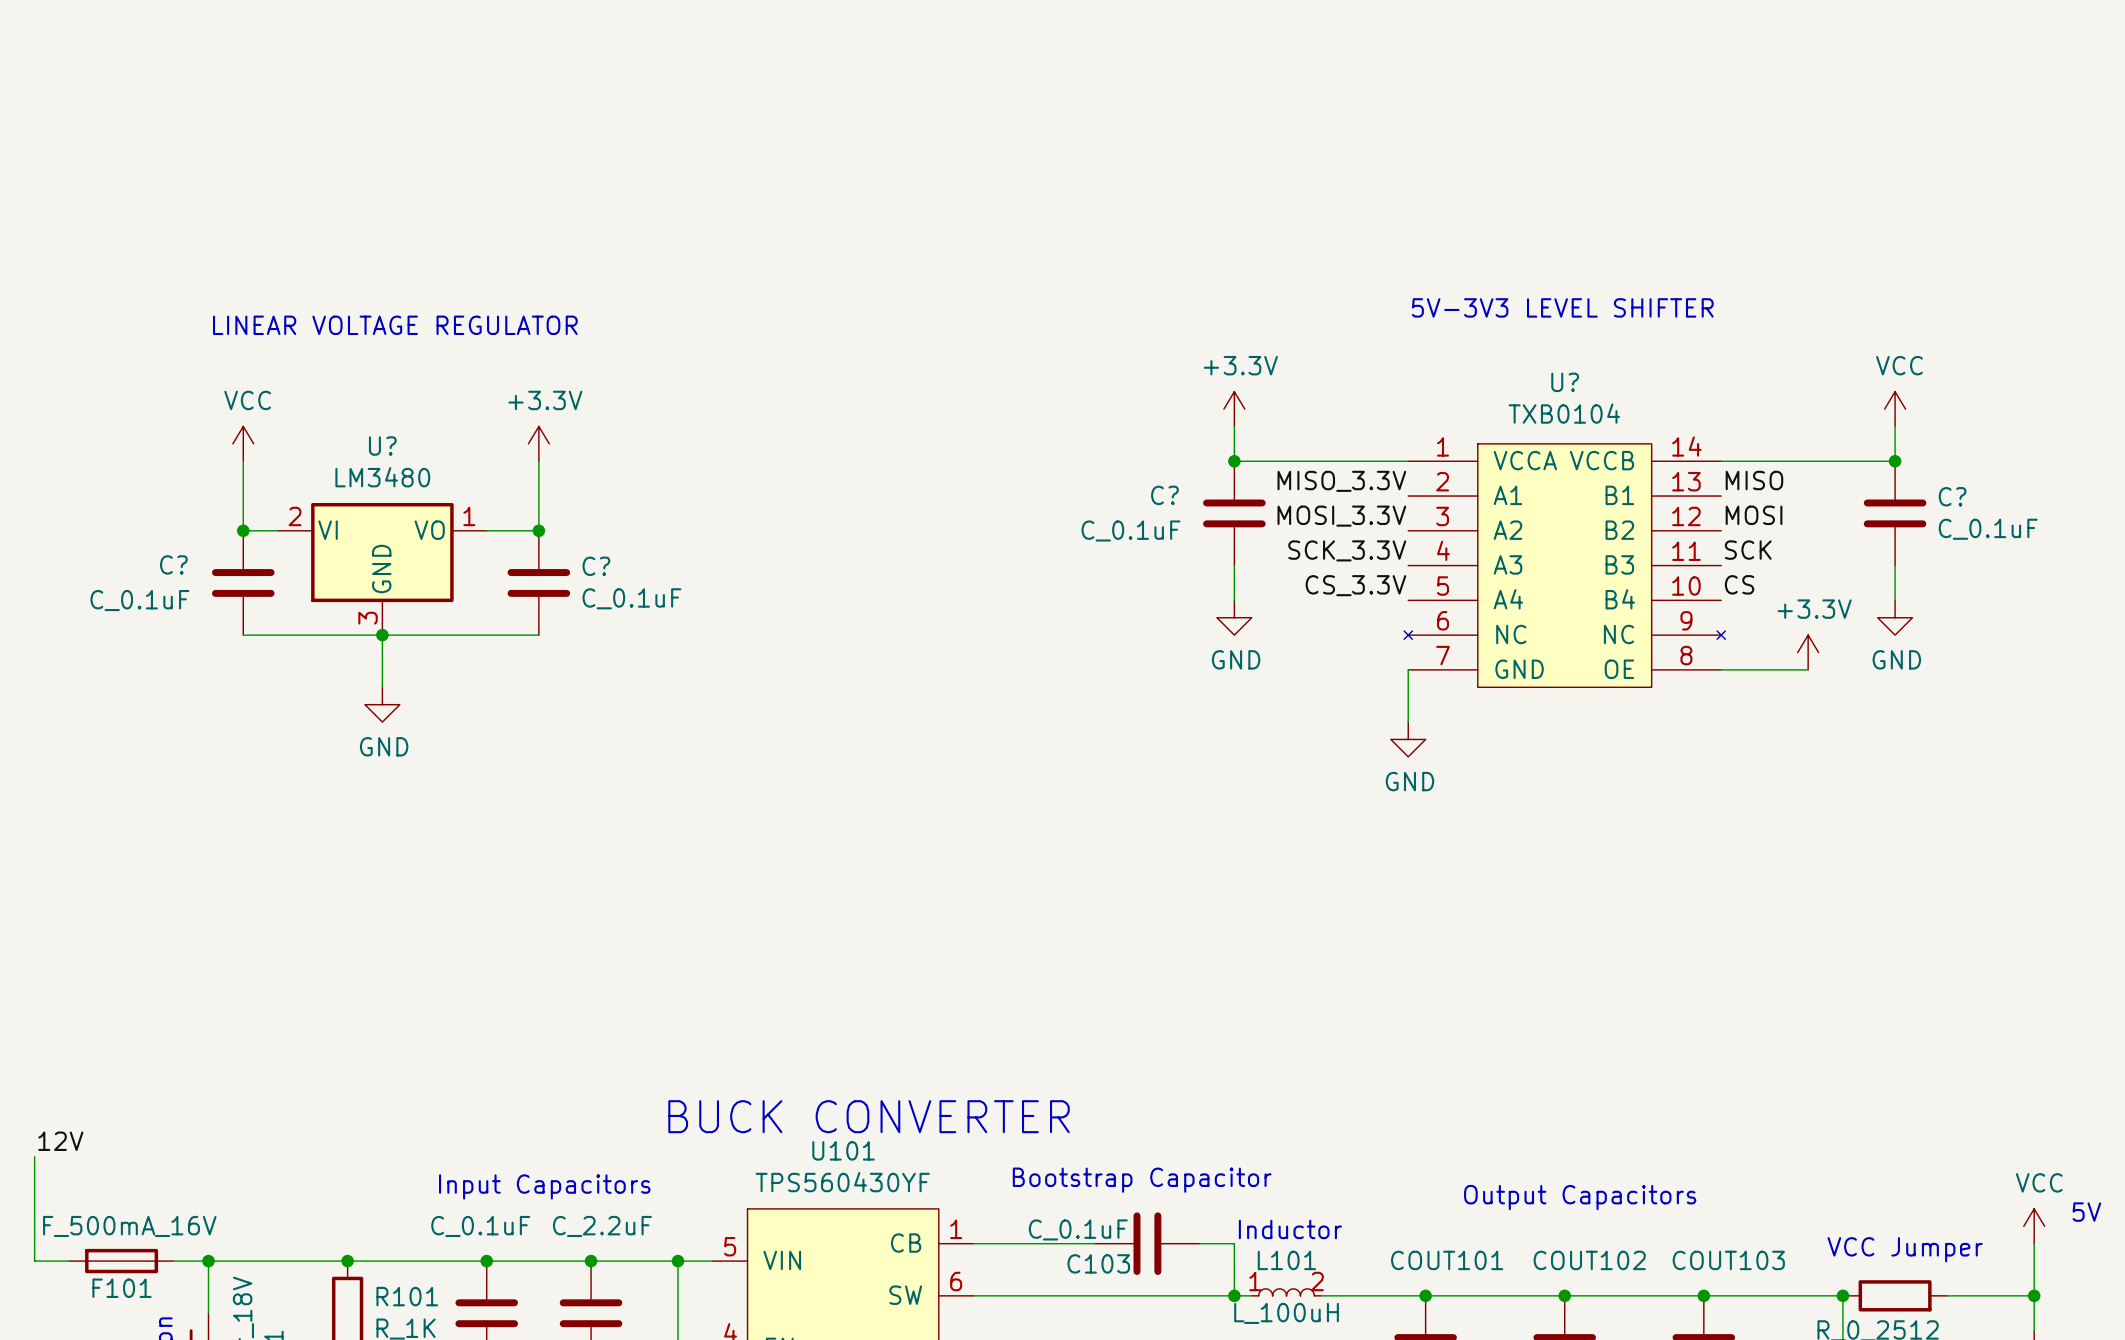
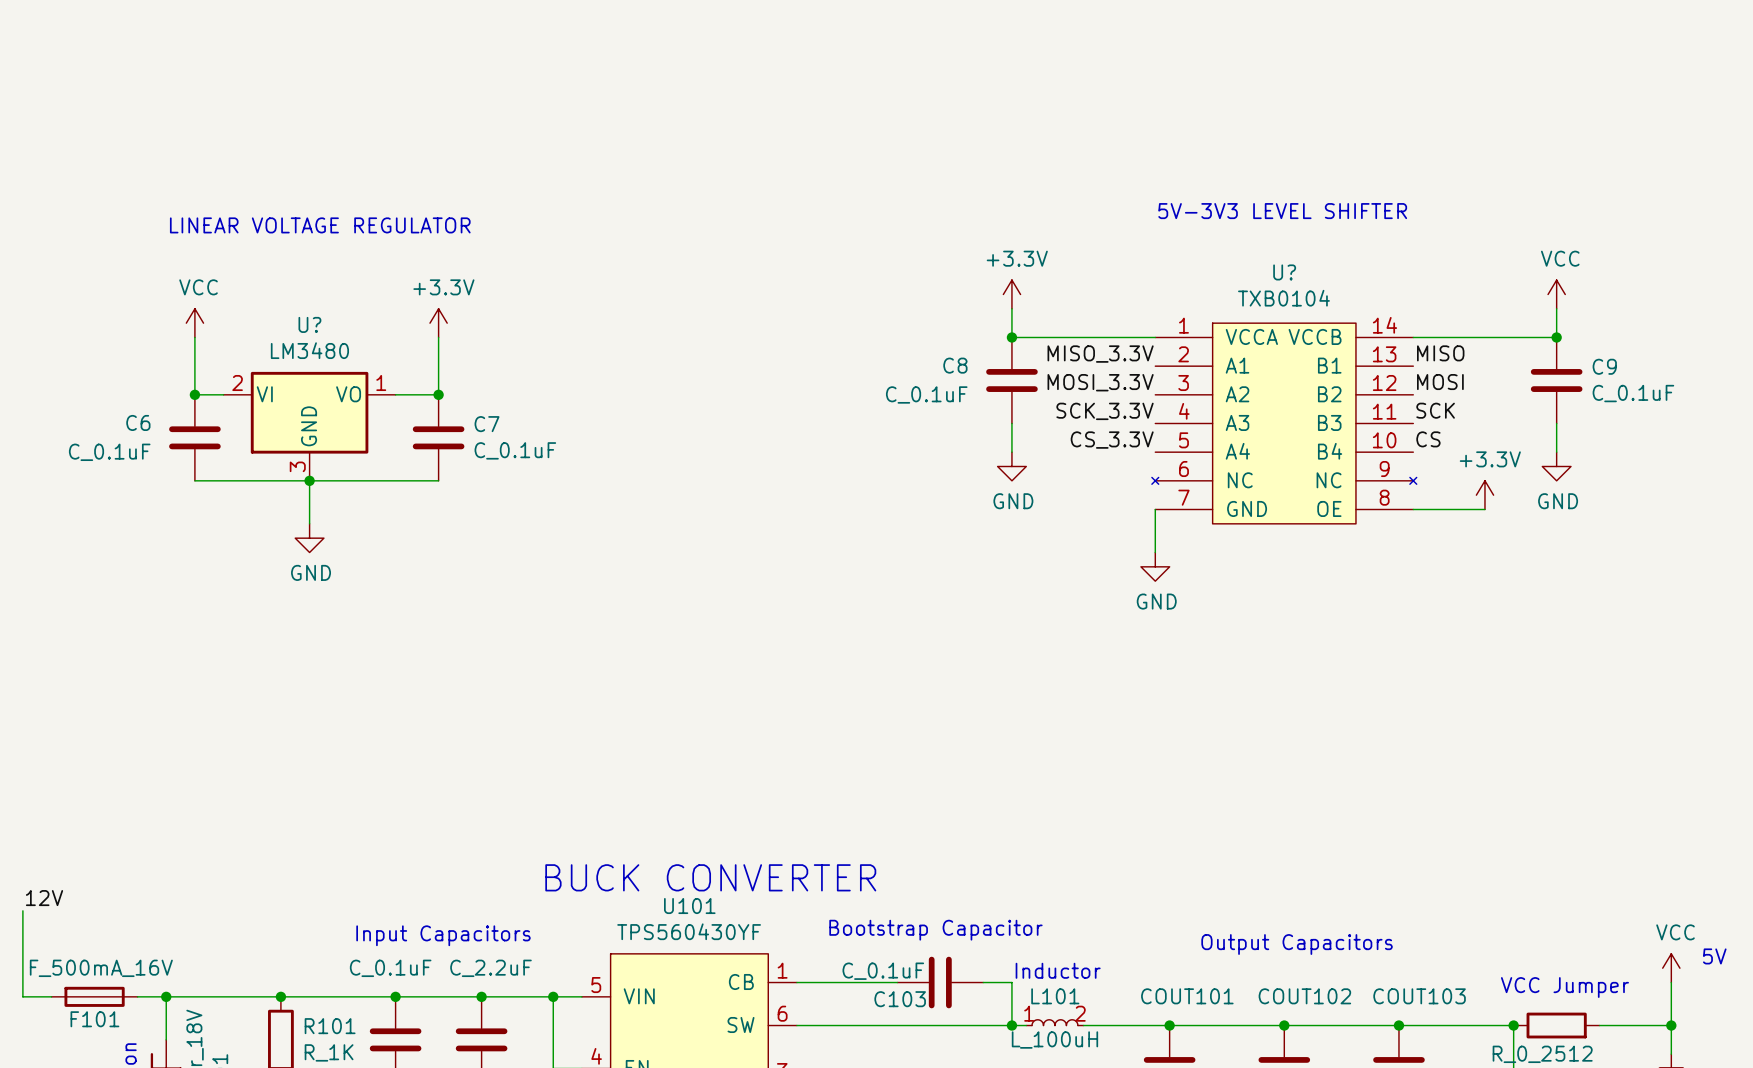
C? name: C? (1164, 495) -> C8 (955, 365)
C? name: C? (1952, 496) -> C9 (1604, 366)
C? name: C? (173, 564) -> C6 (138, 422)
C? name: C? (596, 566) -> C7 (487, 424)

